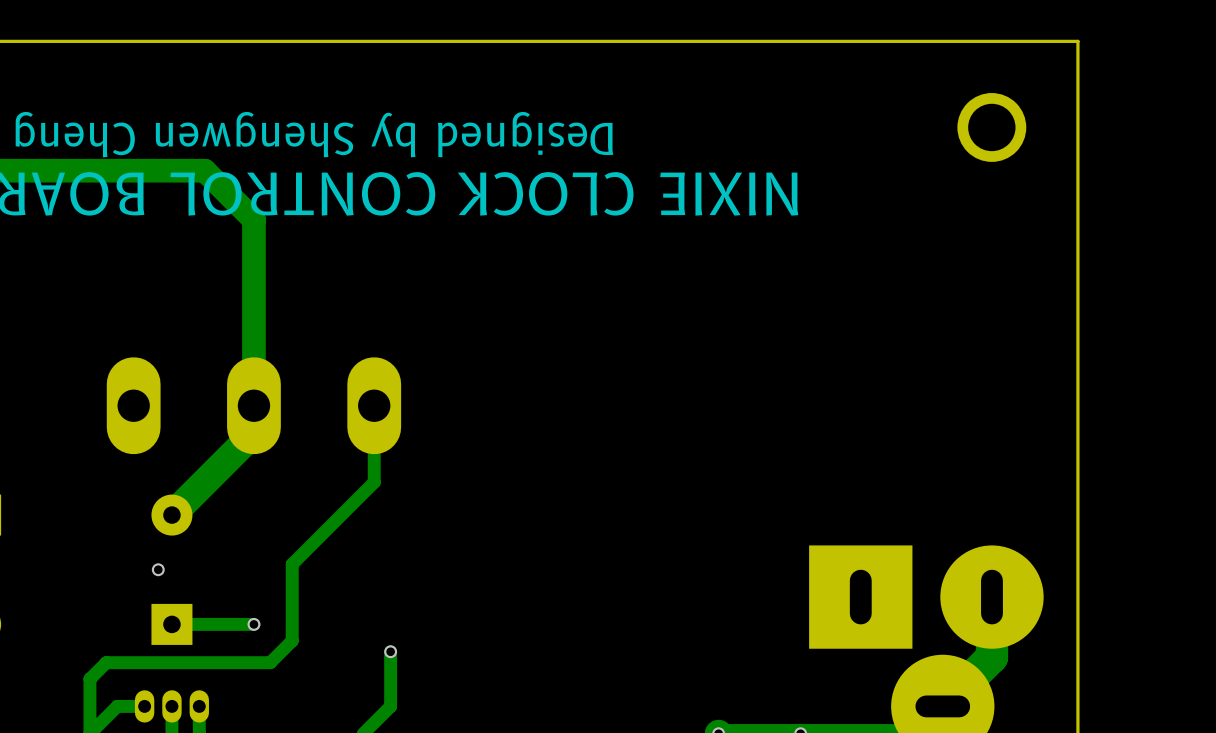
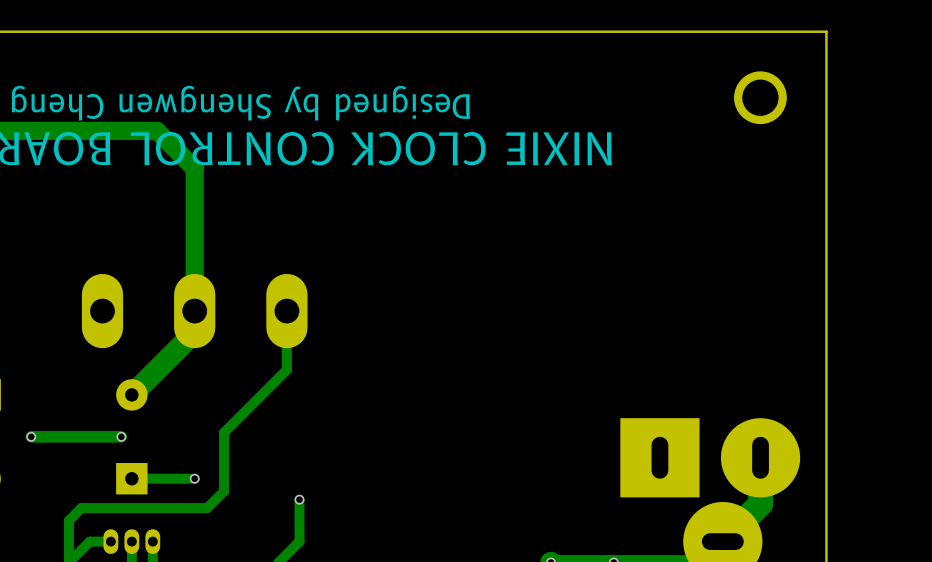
via: none -> (31, 436)
track: none -> (121, 436) (31, 436)

